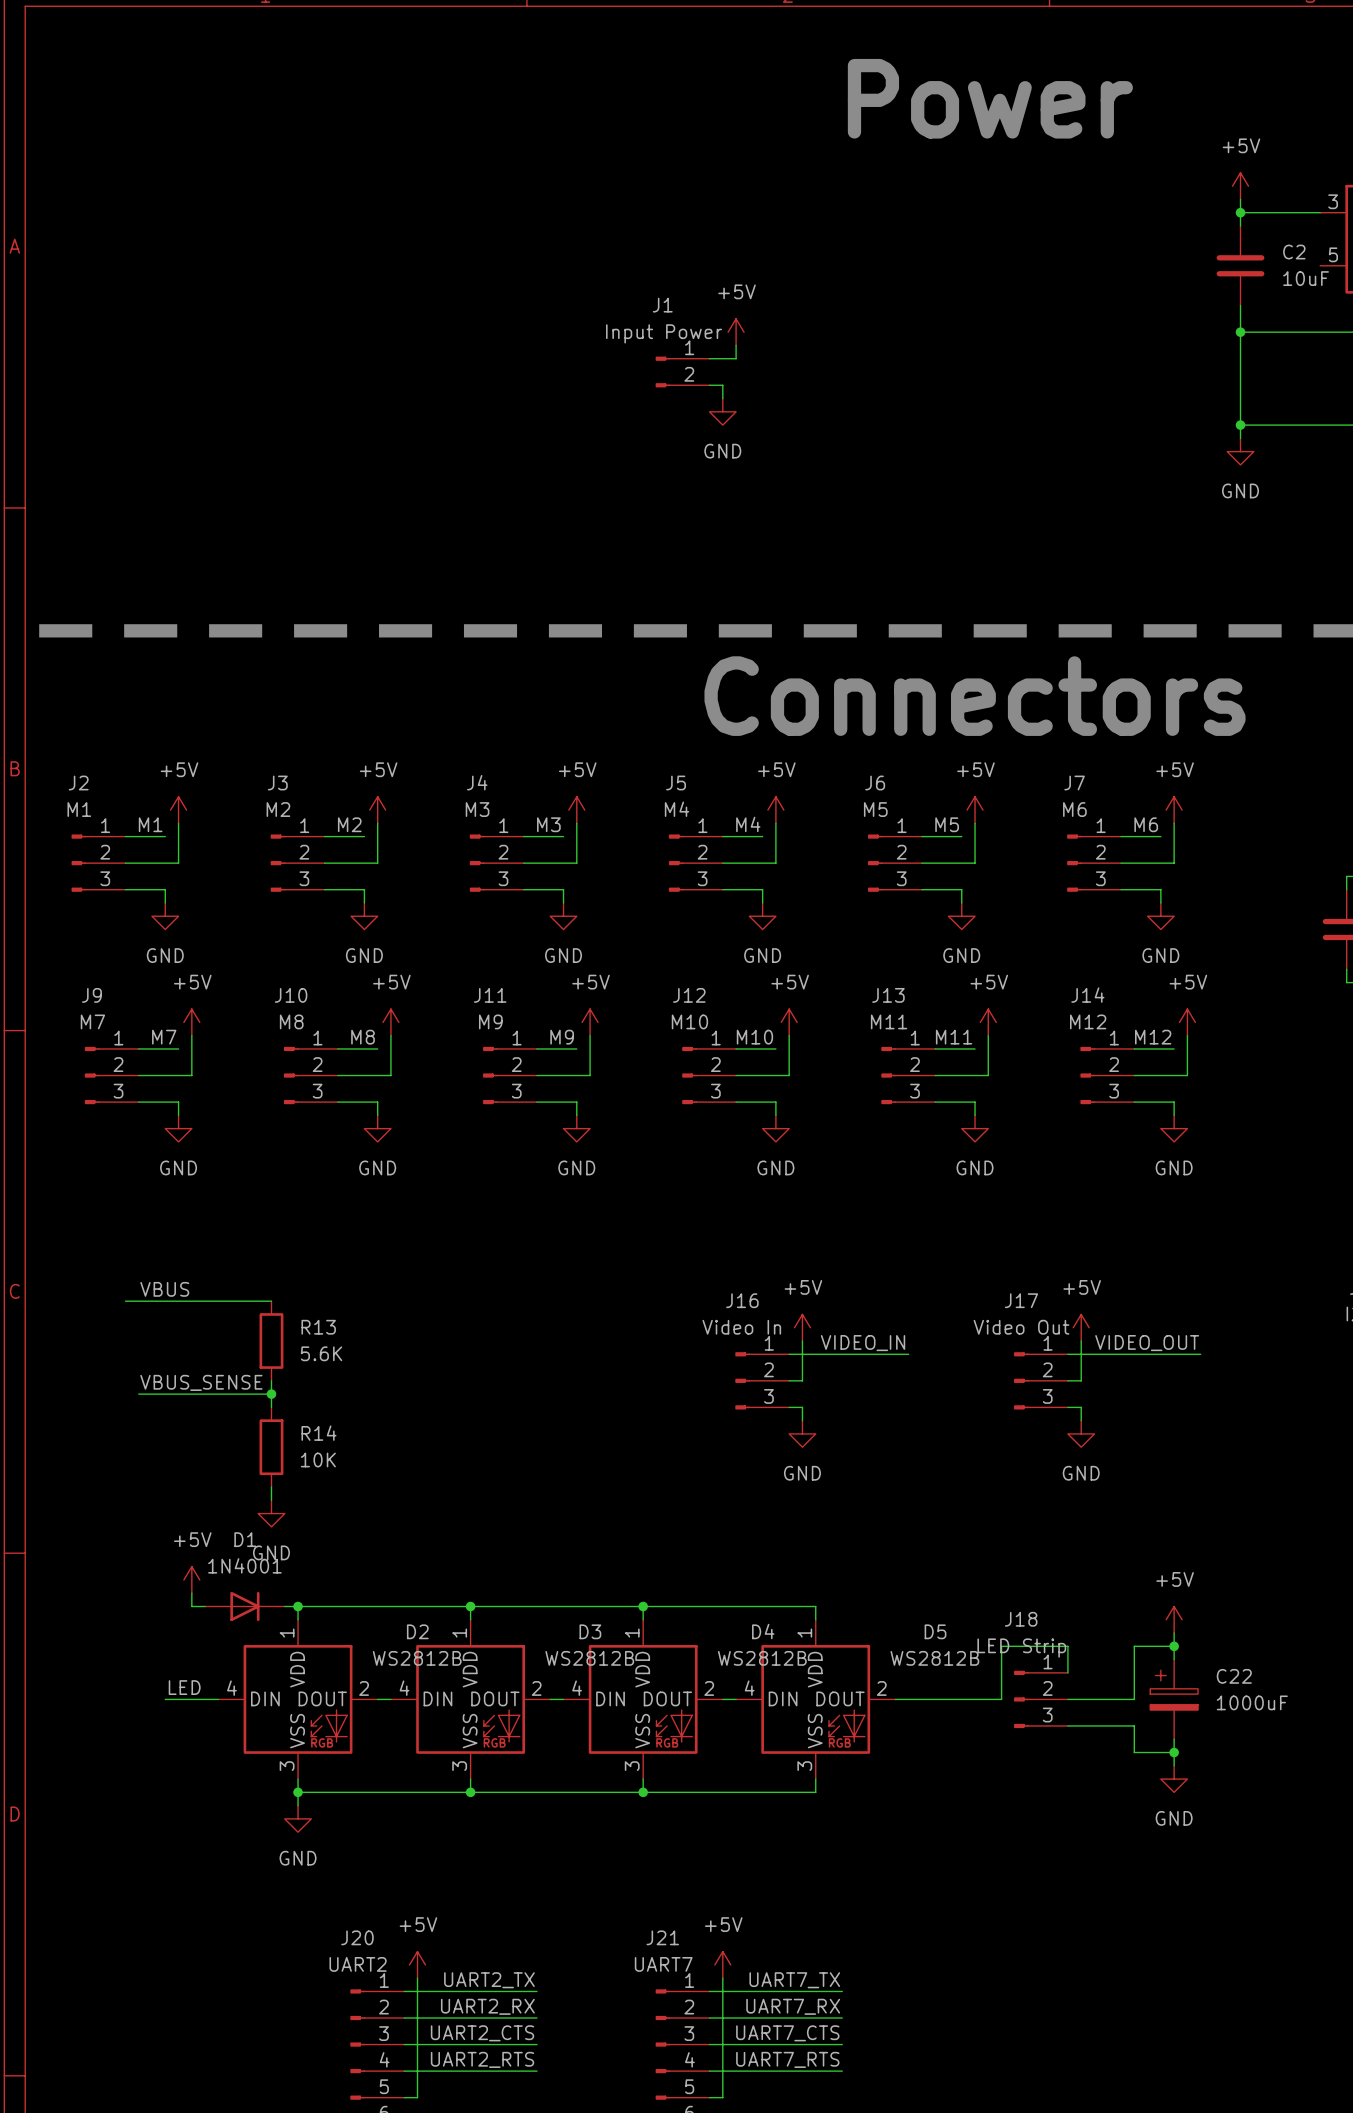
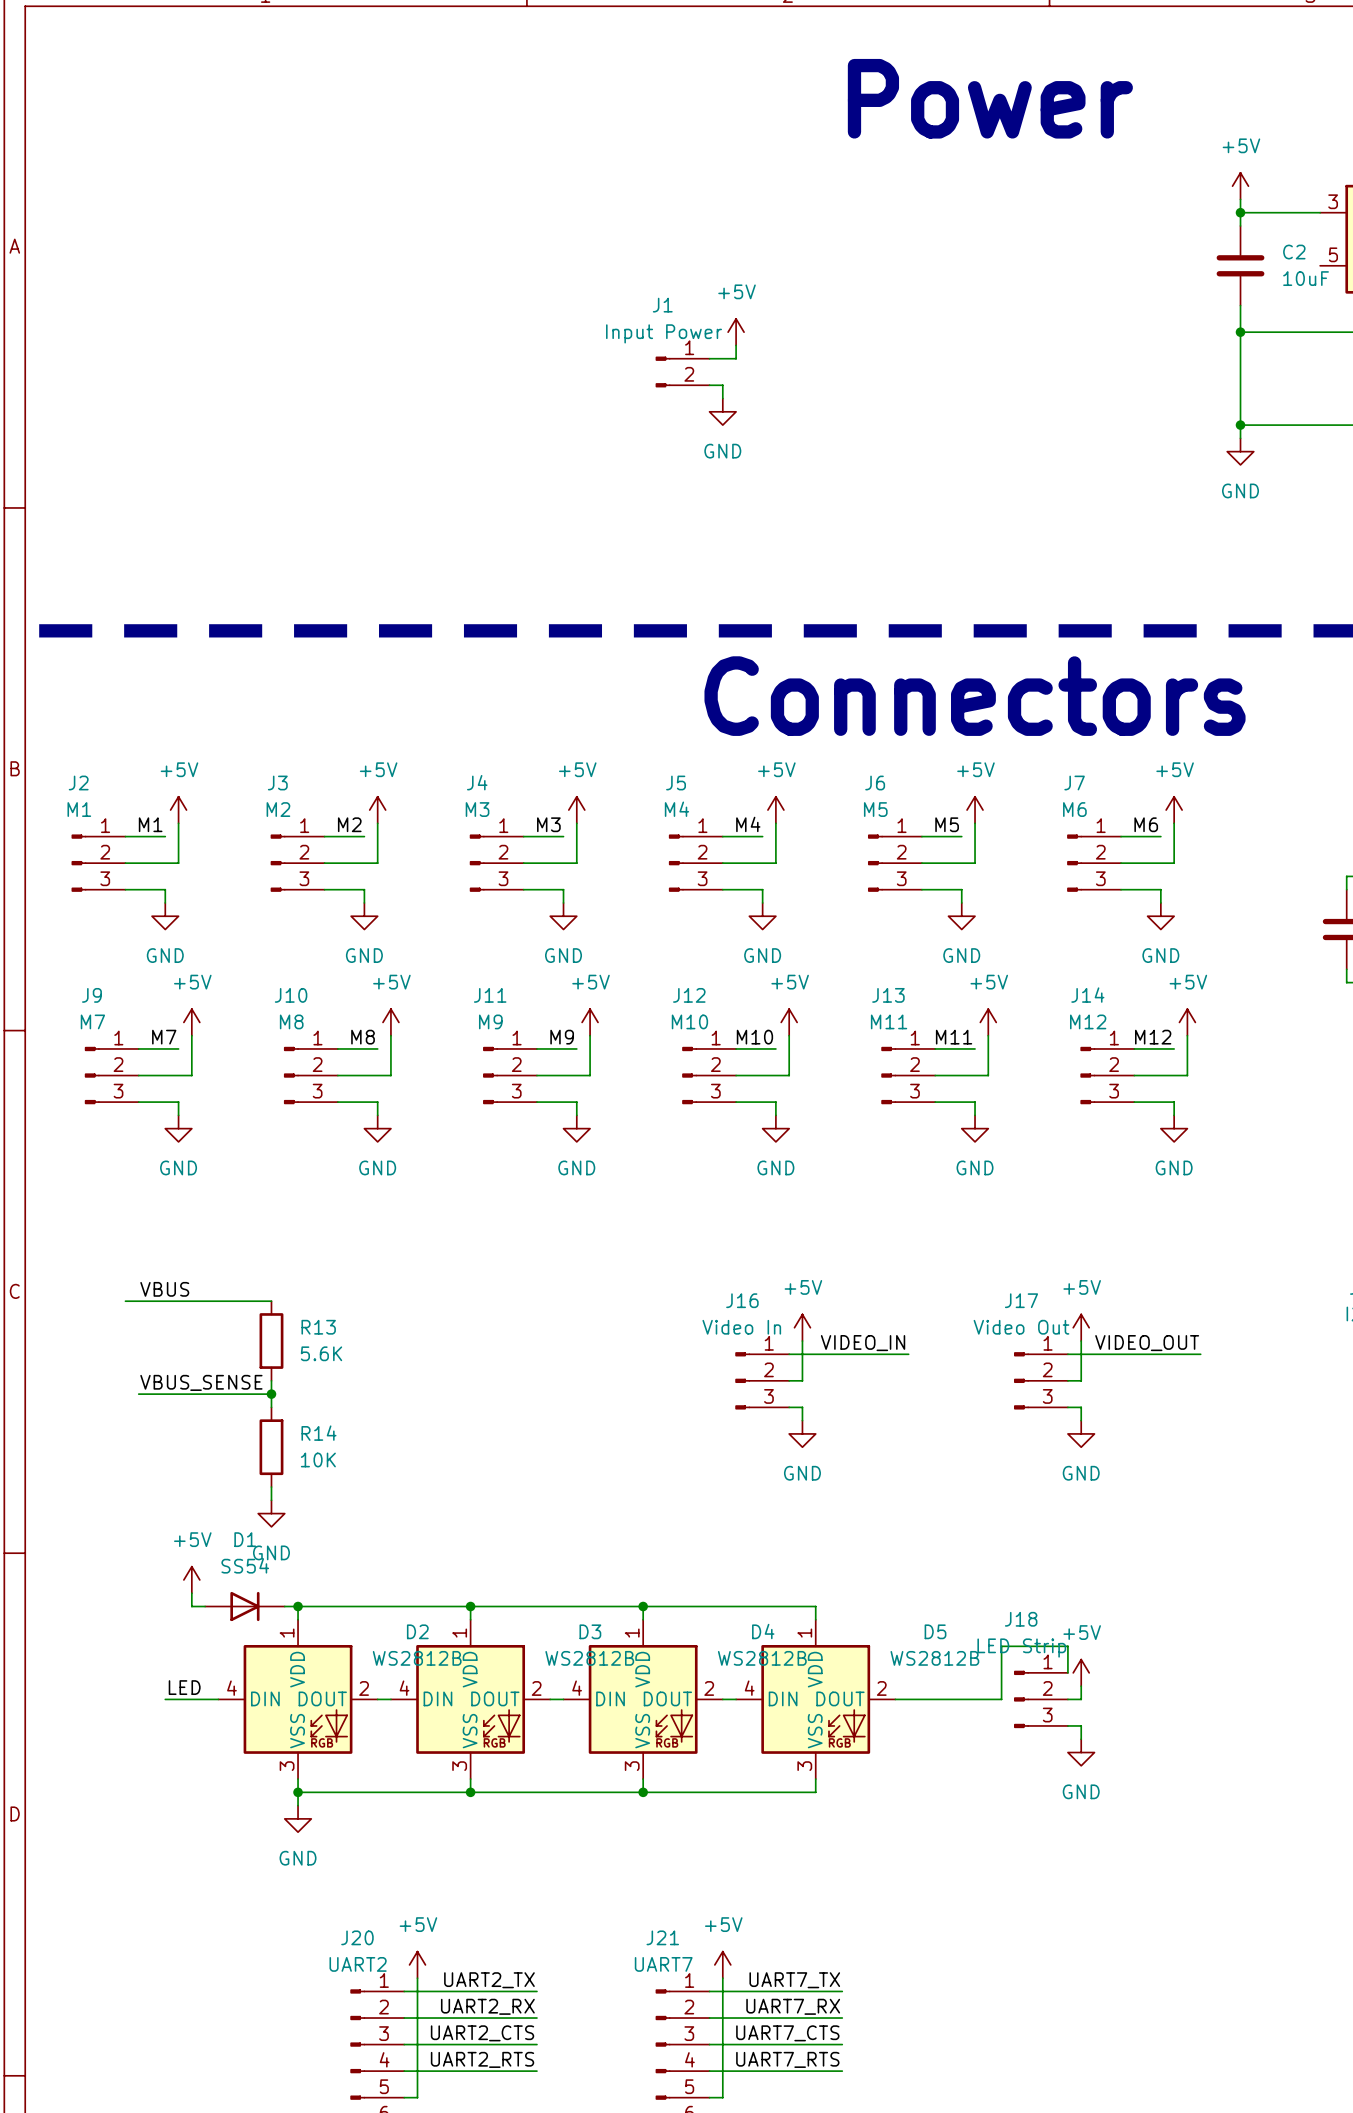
D1 value: 1N4001 (244, 1565) -> SS54 (245, 1565)
power symbol position: +5V (1174, 1619) -> +5V (1081, 1672)
wire: (1174, 1633) (1174, 1659) -> none
wire: (1174, 1646) (1134, 1646) (1134, 1699) (1081, 1699) -> (1081, 1686) (1081, 1699)
junction: (1174, 1646) -> none
C22: 1000uF (1174, 1699) -> none
wire: (1081, 1725) (1134, 1725) (1134, 1752) (1174, 1752) -> (1081, 1725) (1081, 1739)
wire: (1174, 1739) (1174, 1765) -> none
junction: (1174, 1752) -> none
power symbol position: GND (1174, 1779) -> GND (1081, 1752)

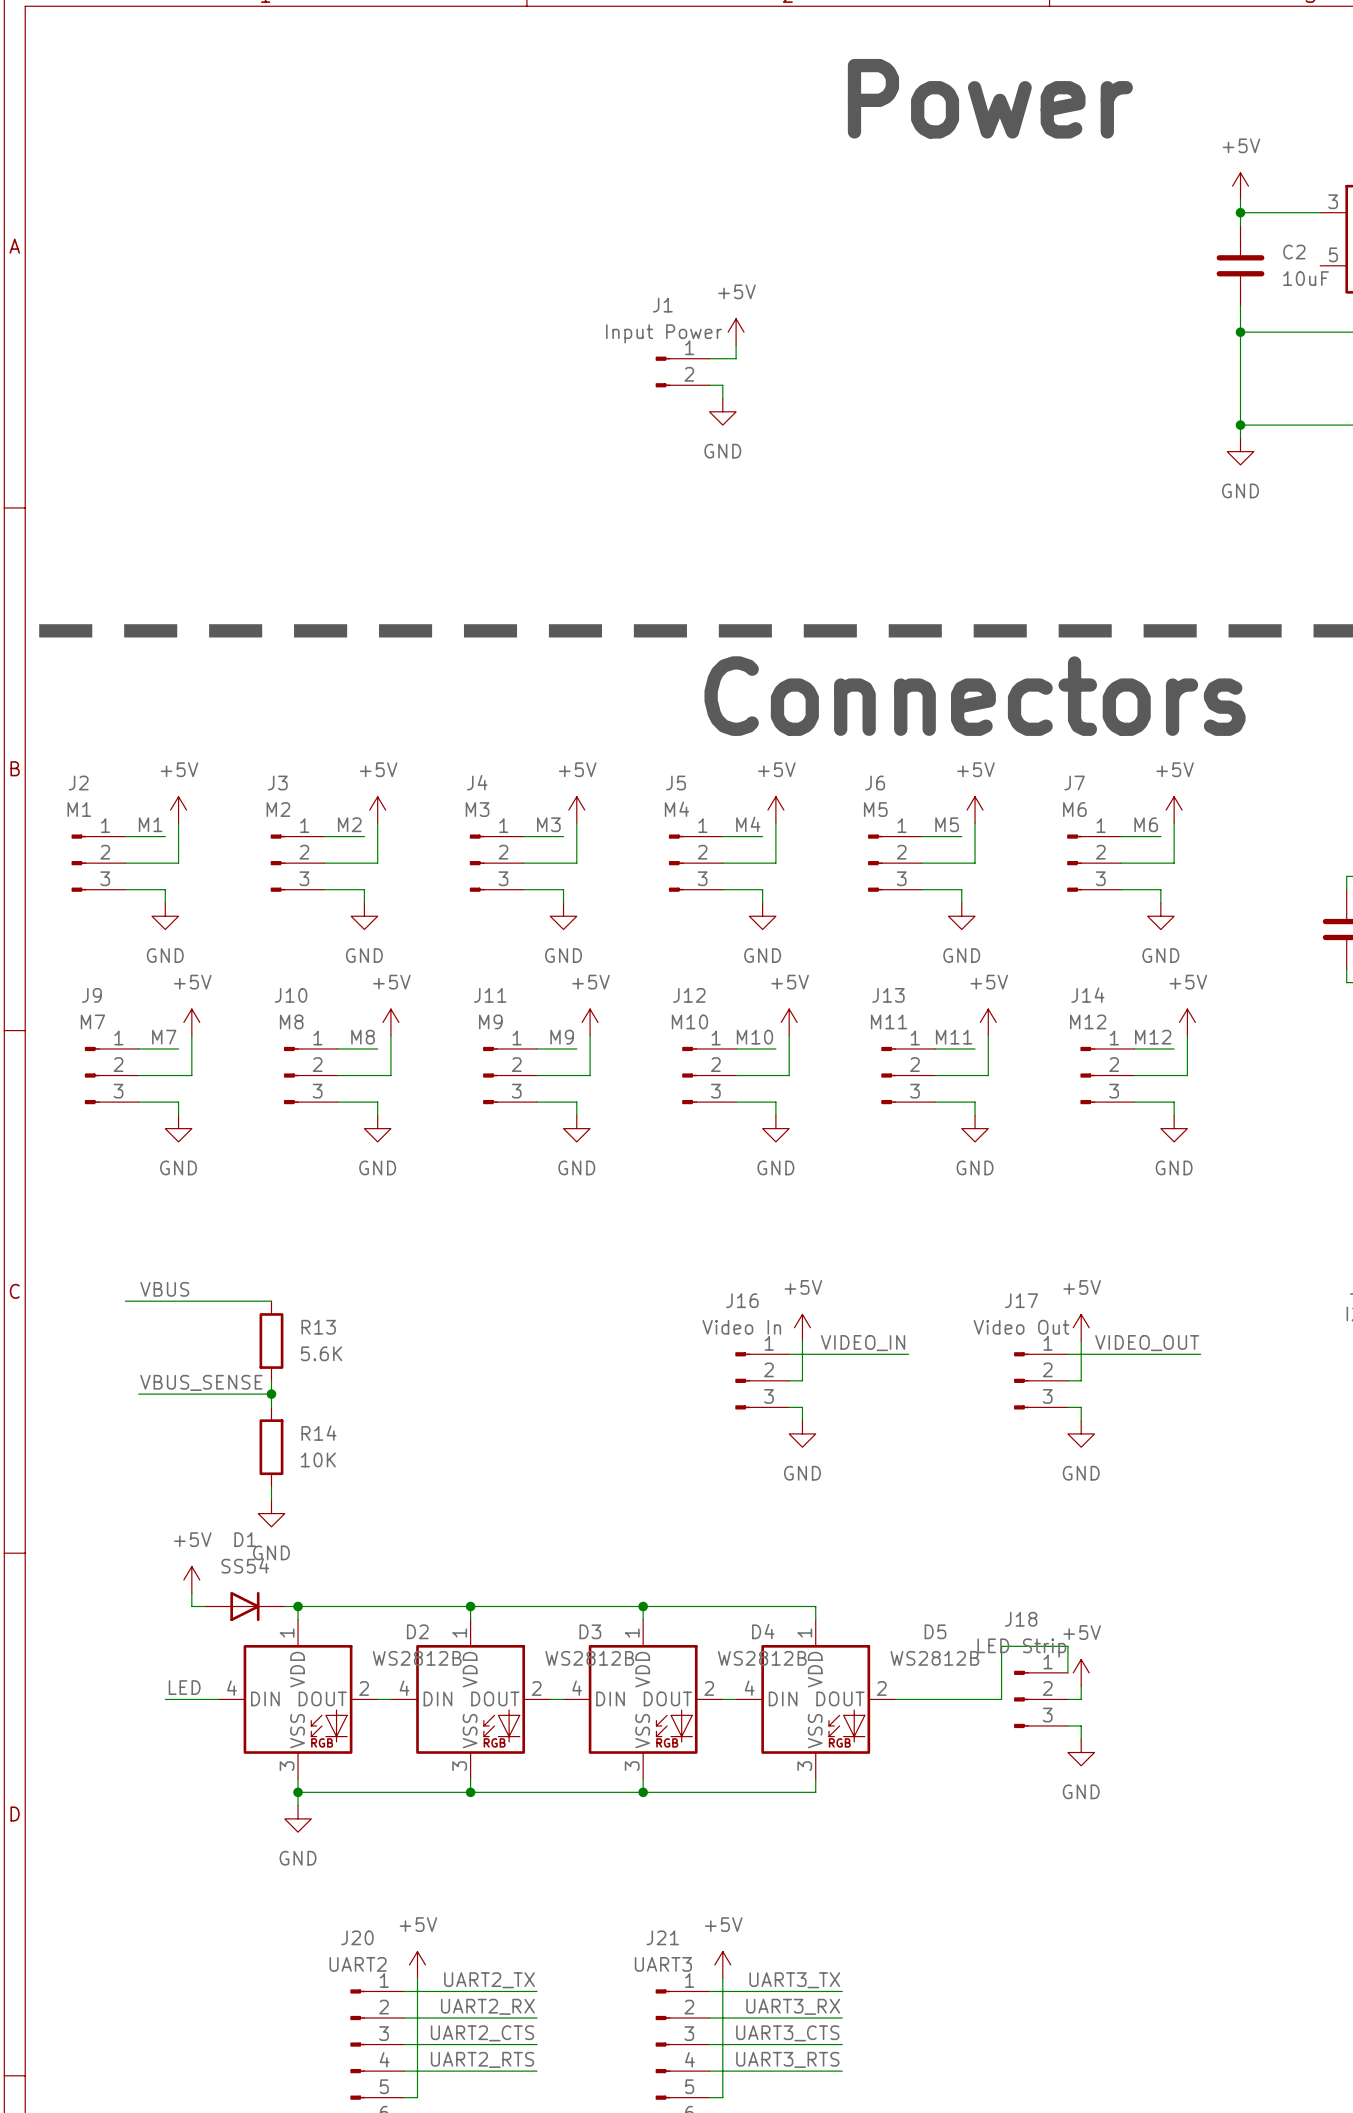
J21 value: UART7 (663, 1964) -> UART3 (663, 1964)
label: UART7_TX (794, 1980) -> UART3_TX (794, 1980)
label: UART7_RX (793, 2006) -> UART3_RX (793, 2006)
label: UART7_CTS (787, 2033) -> UART3_CTS (787, 2033)
label: UART7_RTS (787, 2059) -> UART3_RTS (787, 2059)

